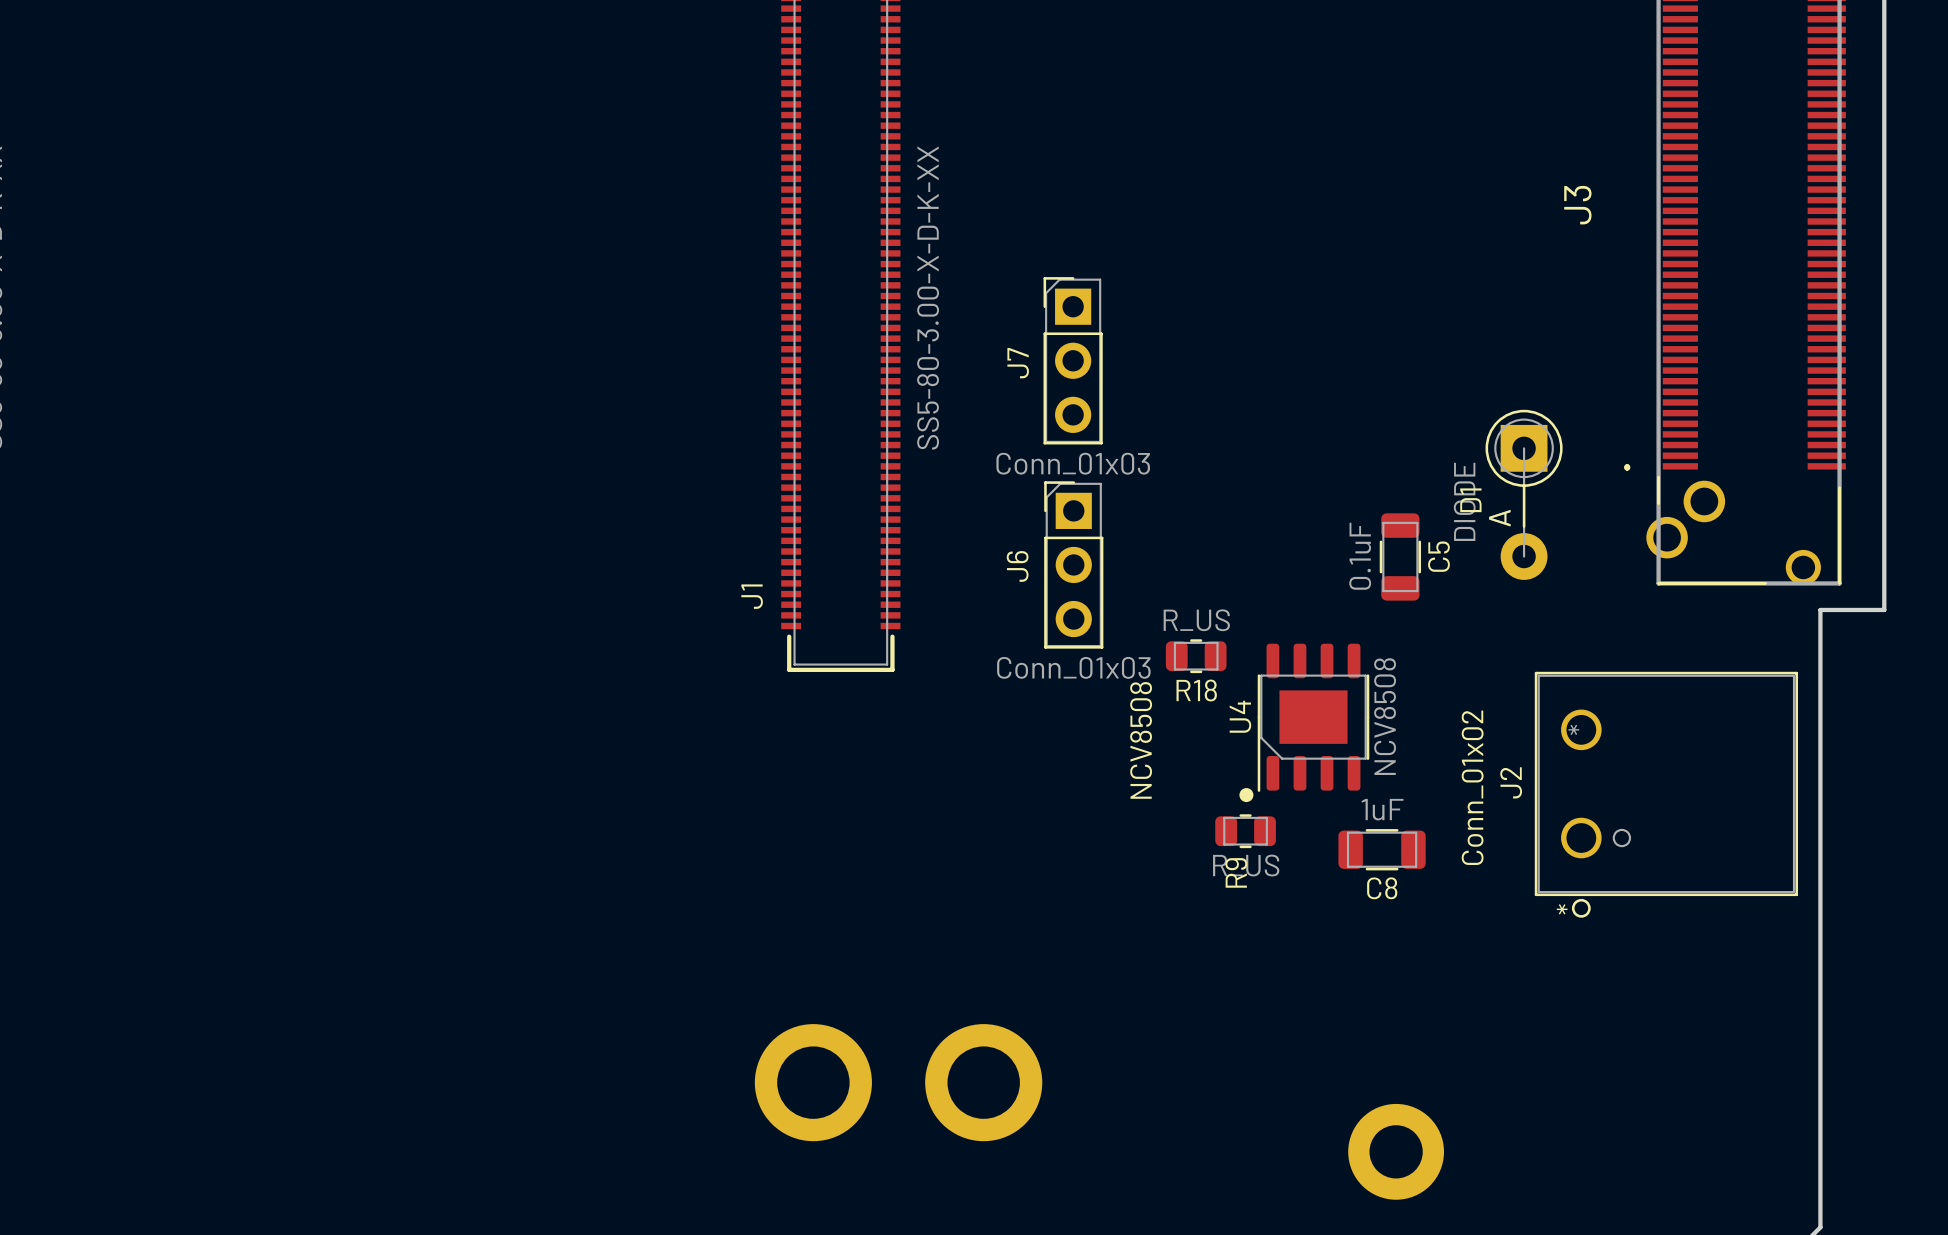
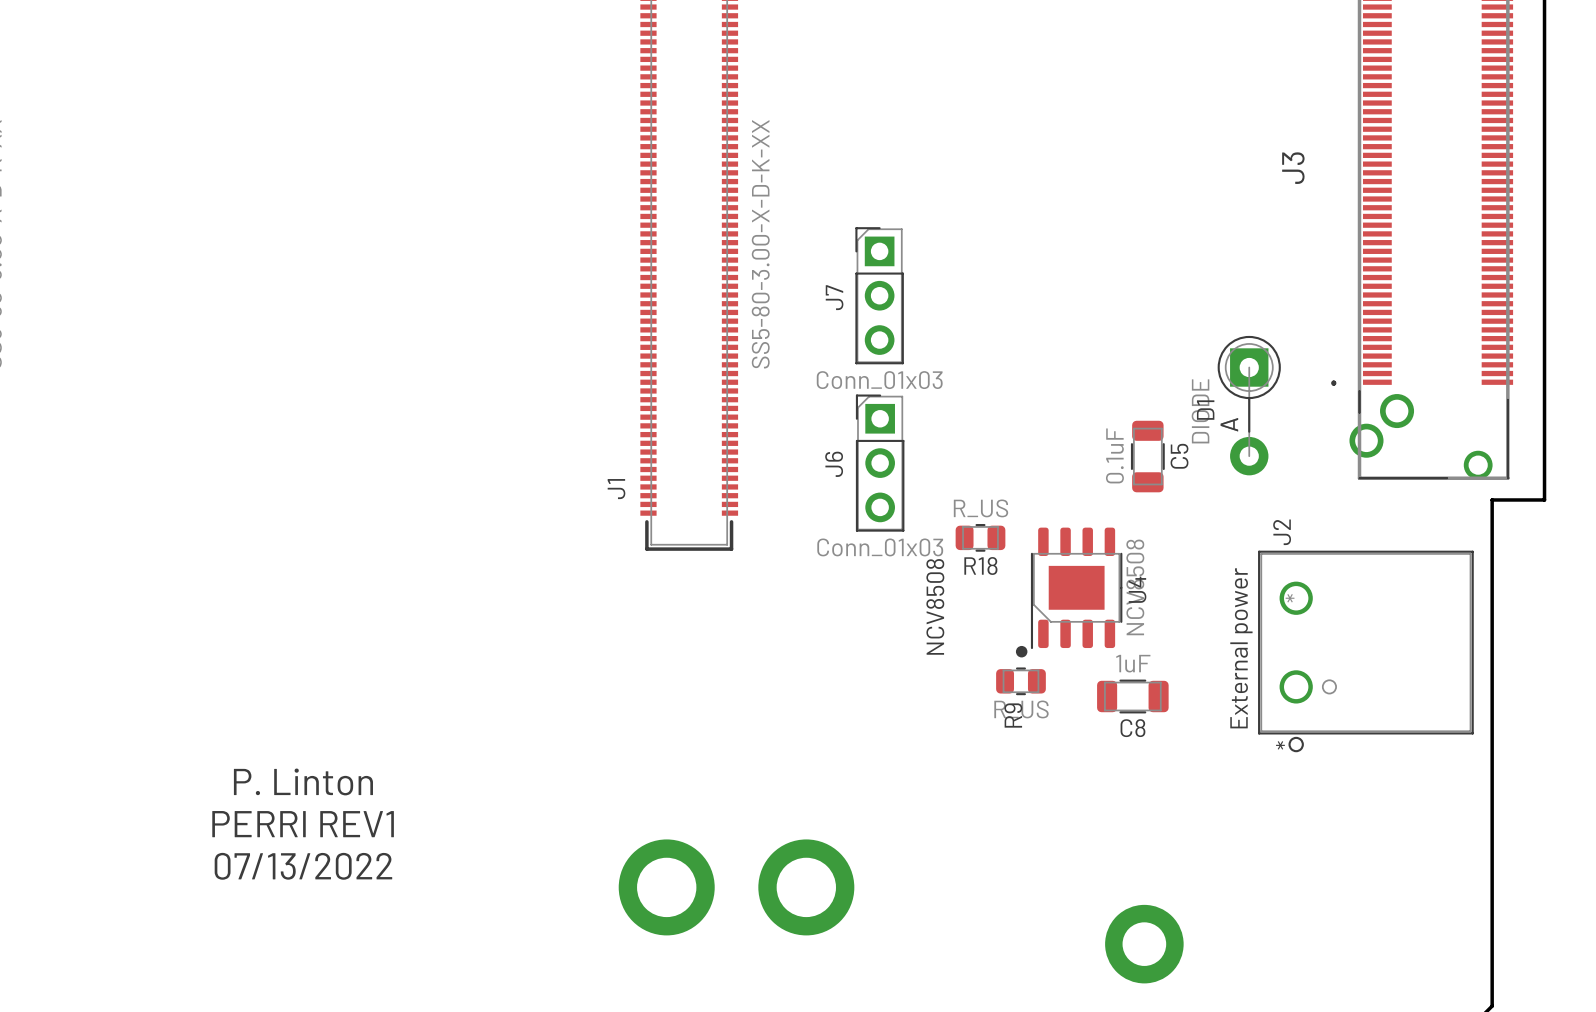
U4 name position: U4 (1240, 716) -> U4 (1137, 589)
J2 name position: J2 (1511, 782) -> J2 (1282, 532)
J2 value: Conn_01x02 (1472, 787) -> External power (1241, 648)
text: none -> P. Linton (303, 781)
text: none -> PERRI REV1 (303, 824)
text: none -> 07/13/2022 (303, 866)

